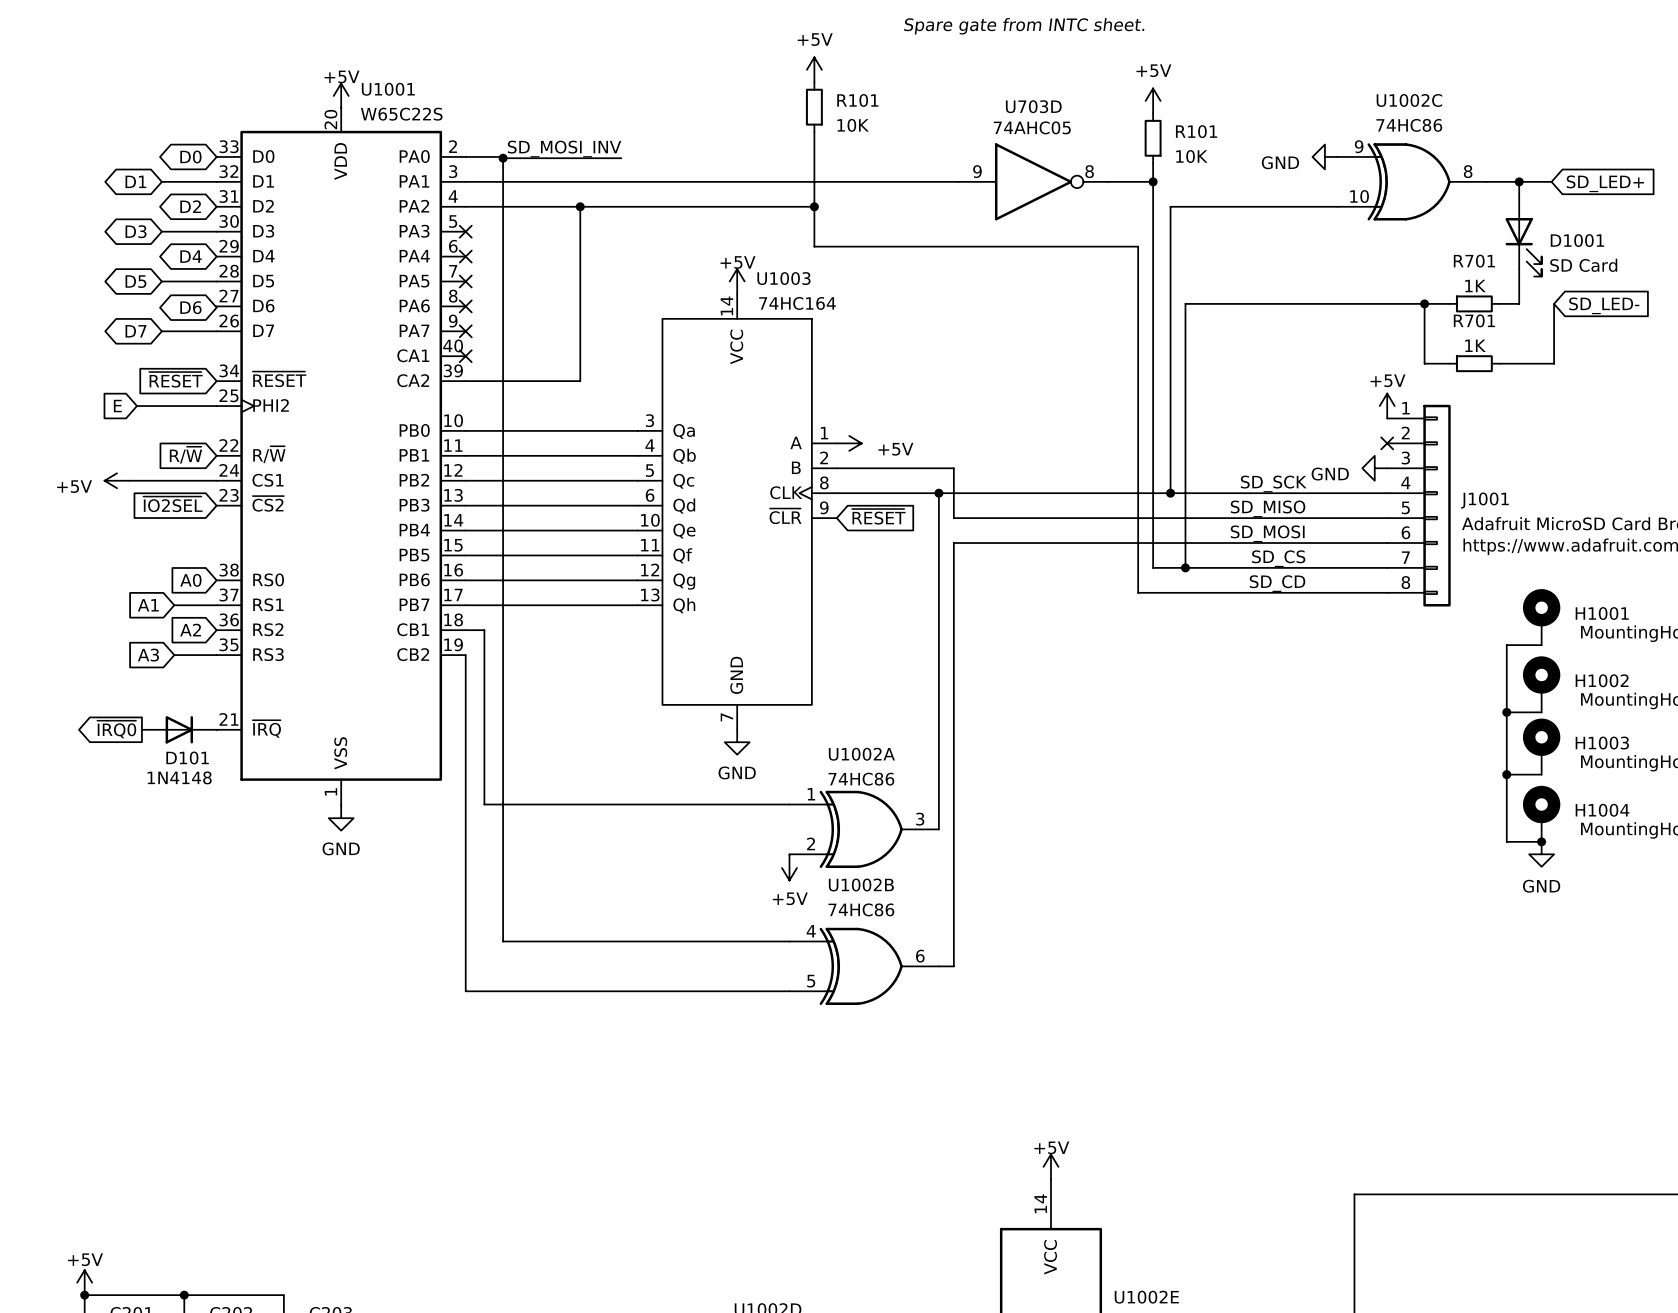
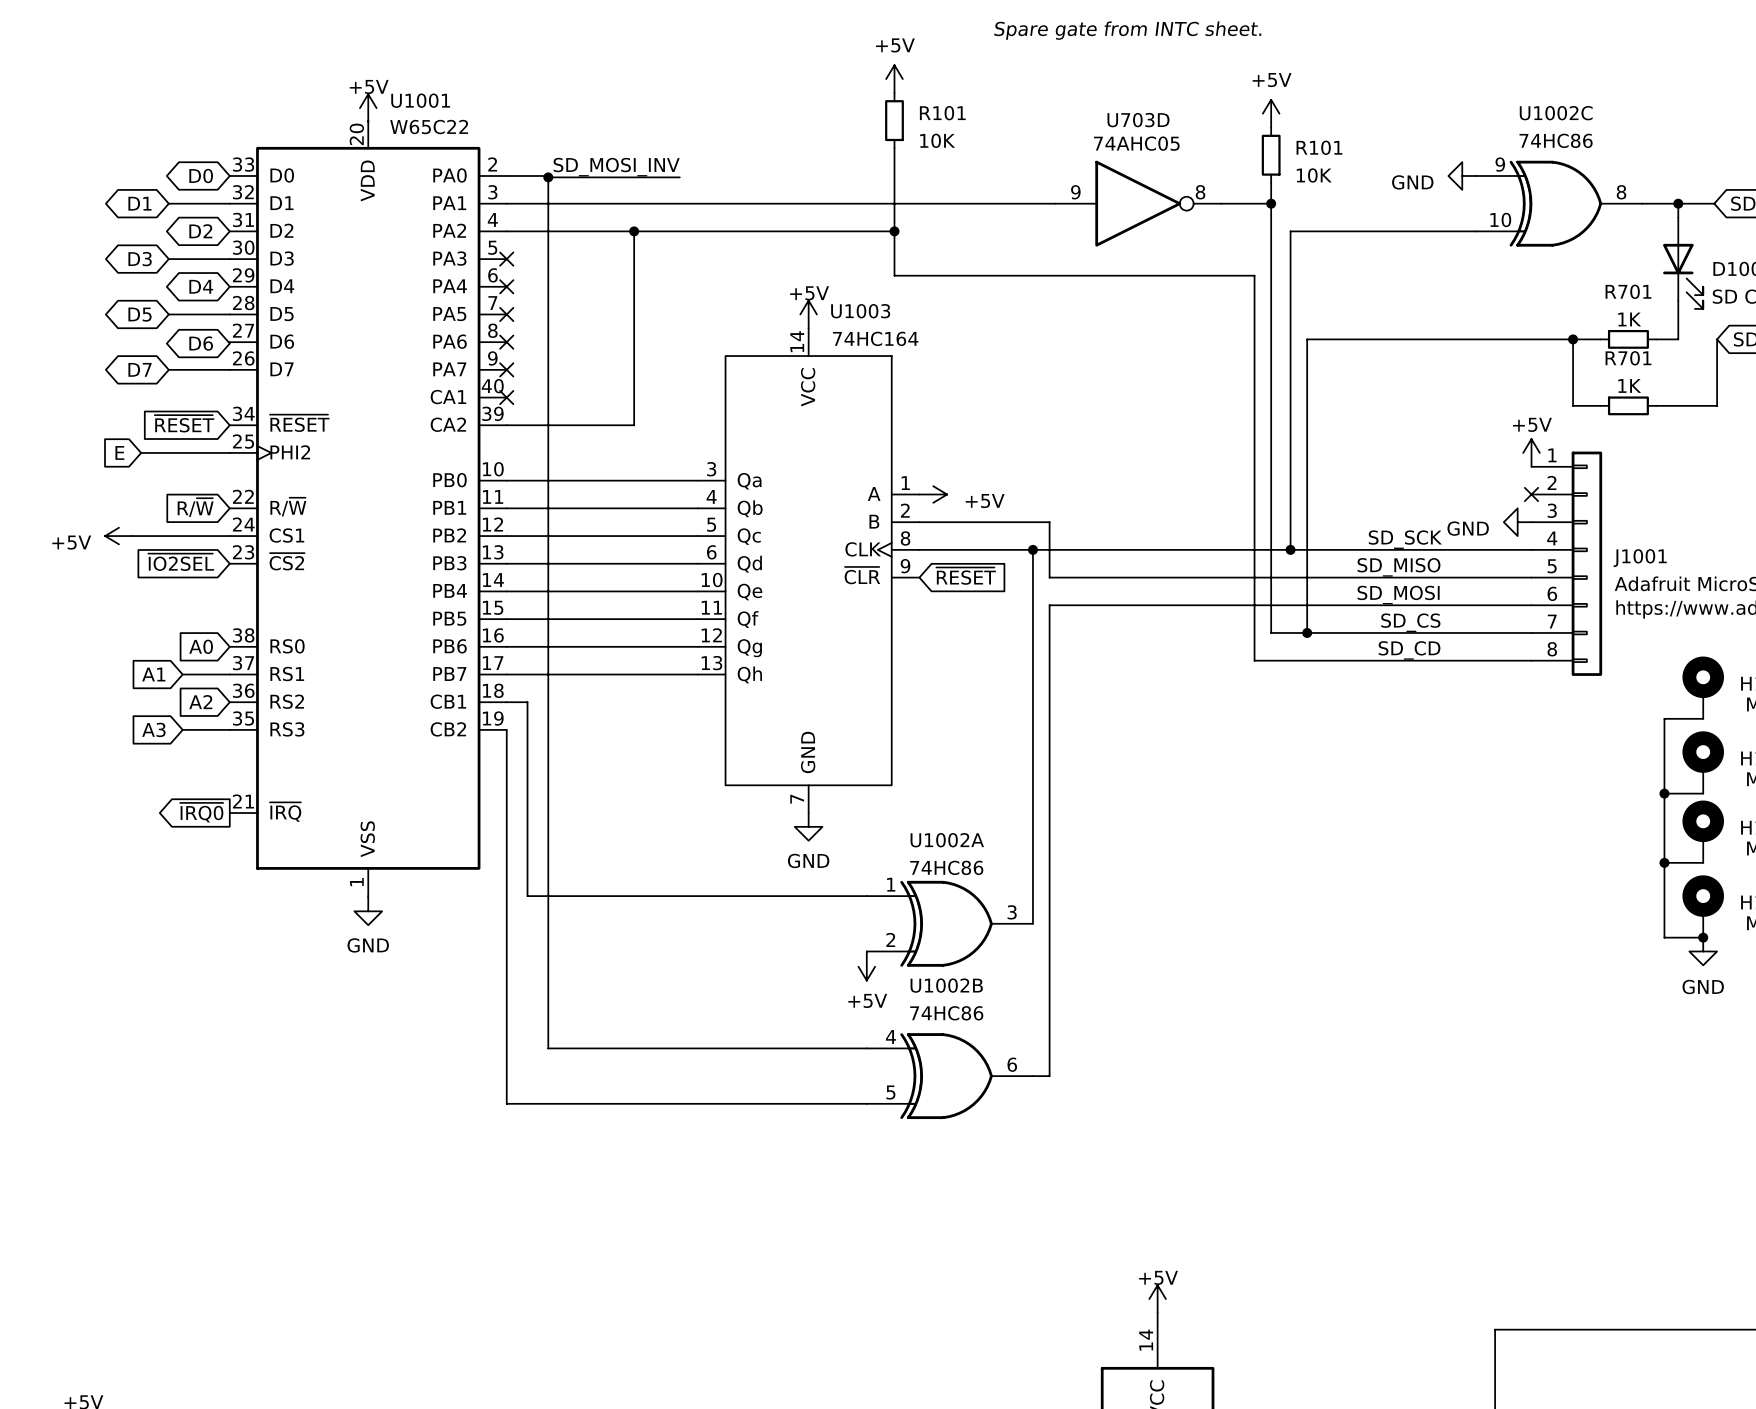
U1001 value: W65C22S (401, 114) -> W65C22 (429, 127)
global label position: ~{IRQ0} (116, 729) -> ~{IRQ0} (201, 812)
D101: 1N4148 (179, 729) -> none

